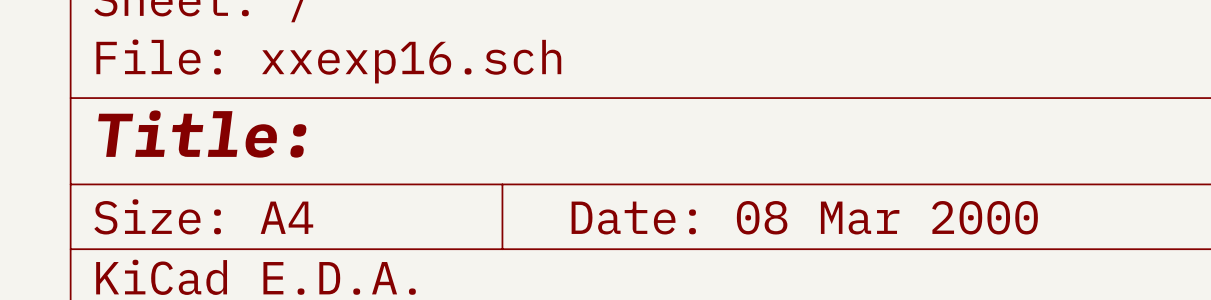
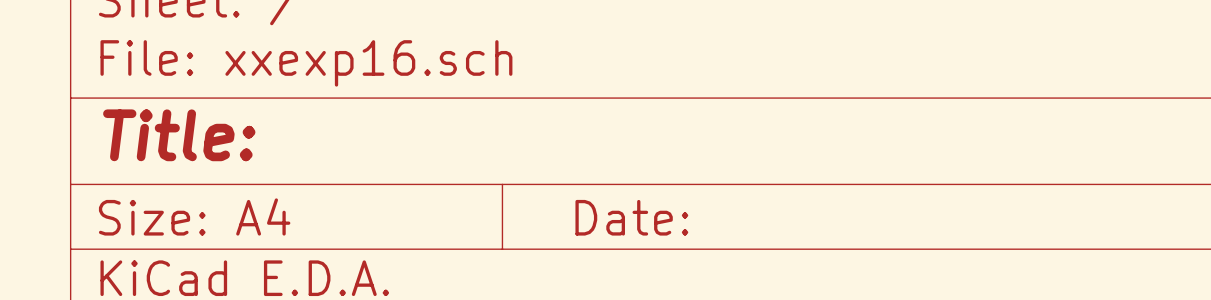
title block: Date: 08 Mar 2000 (804, 217) -> Date: (631, 217)

